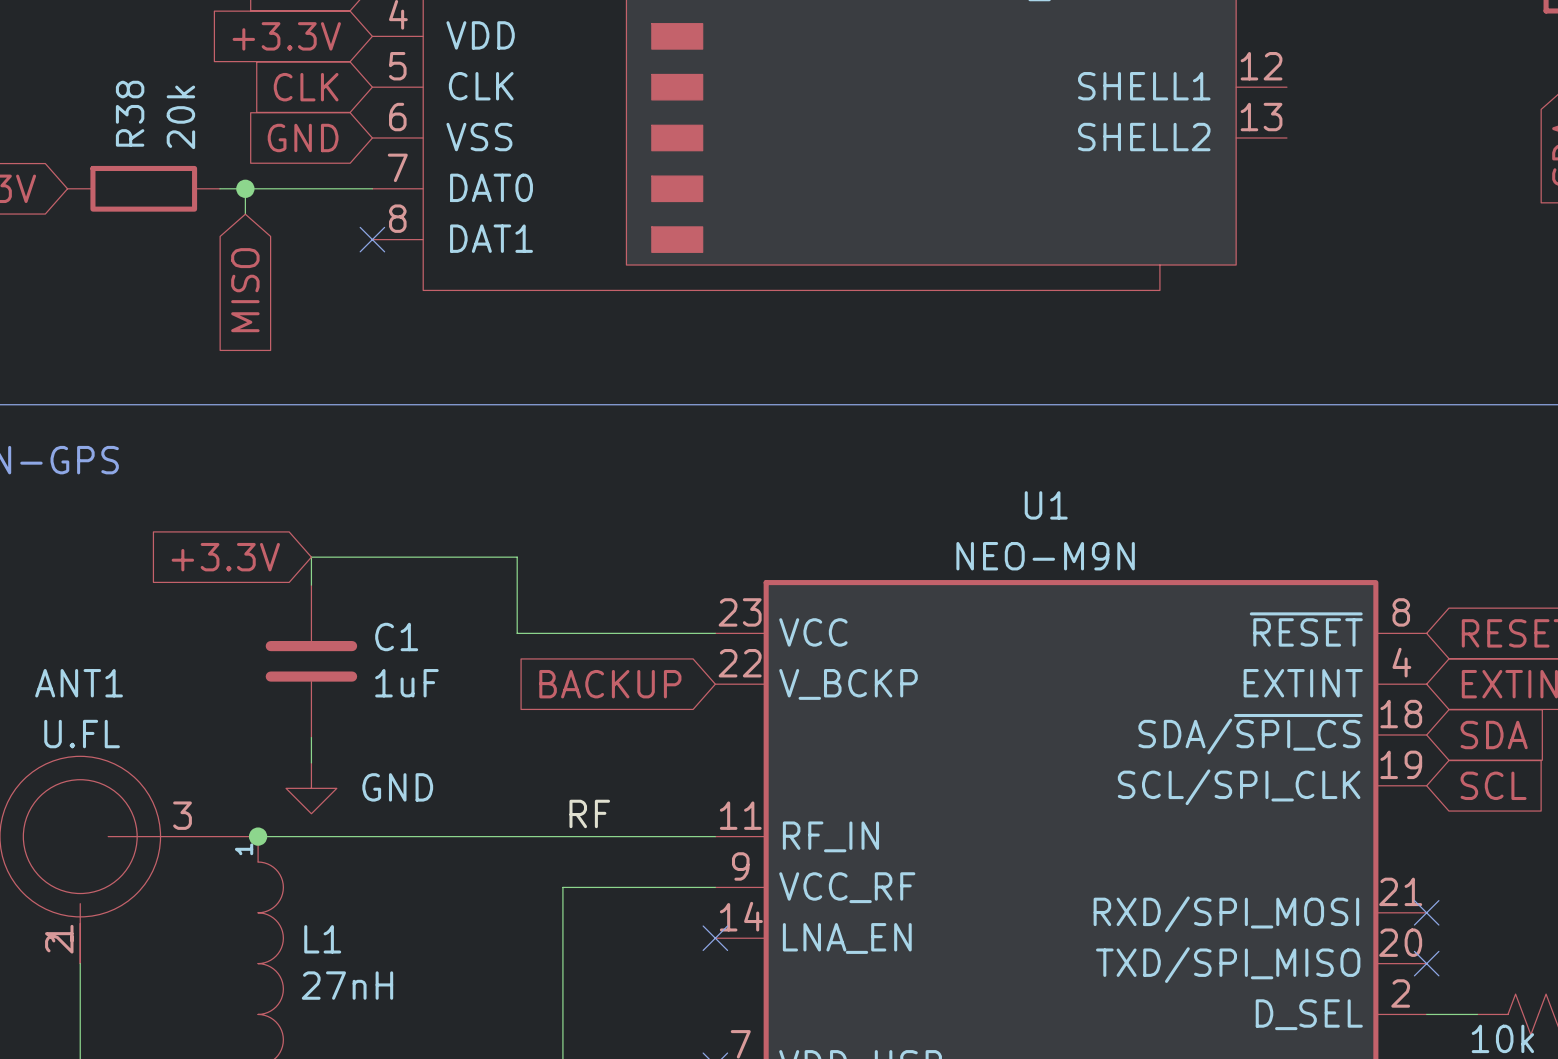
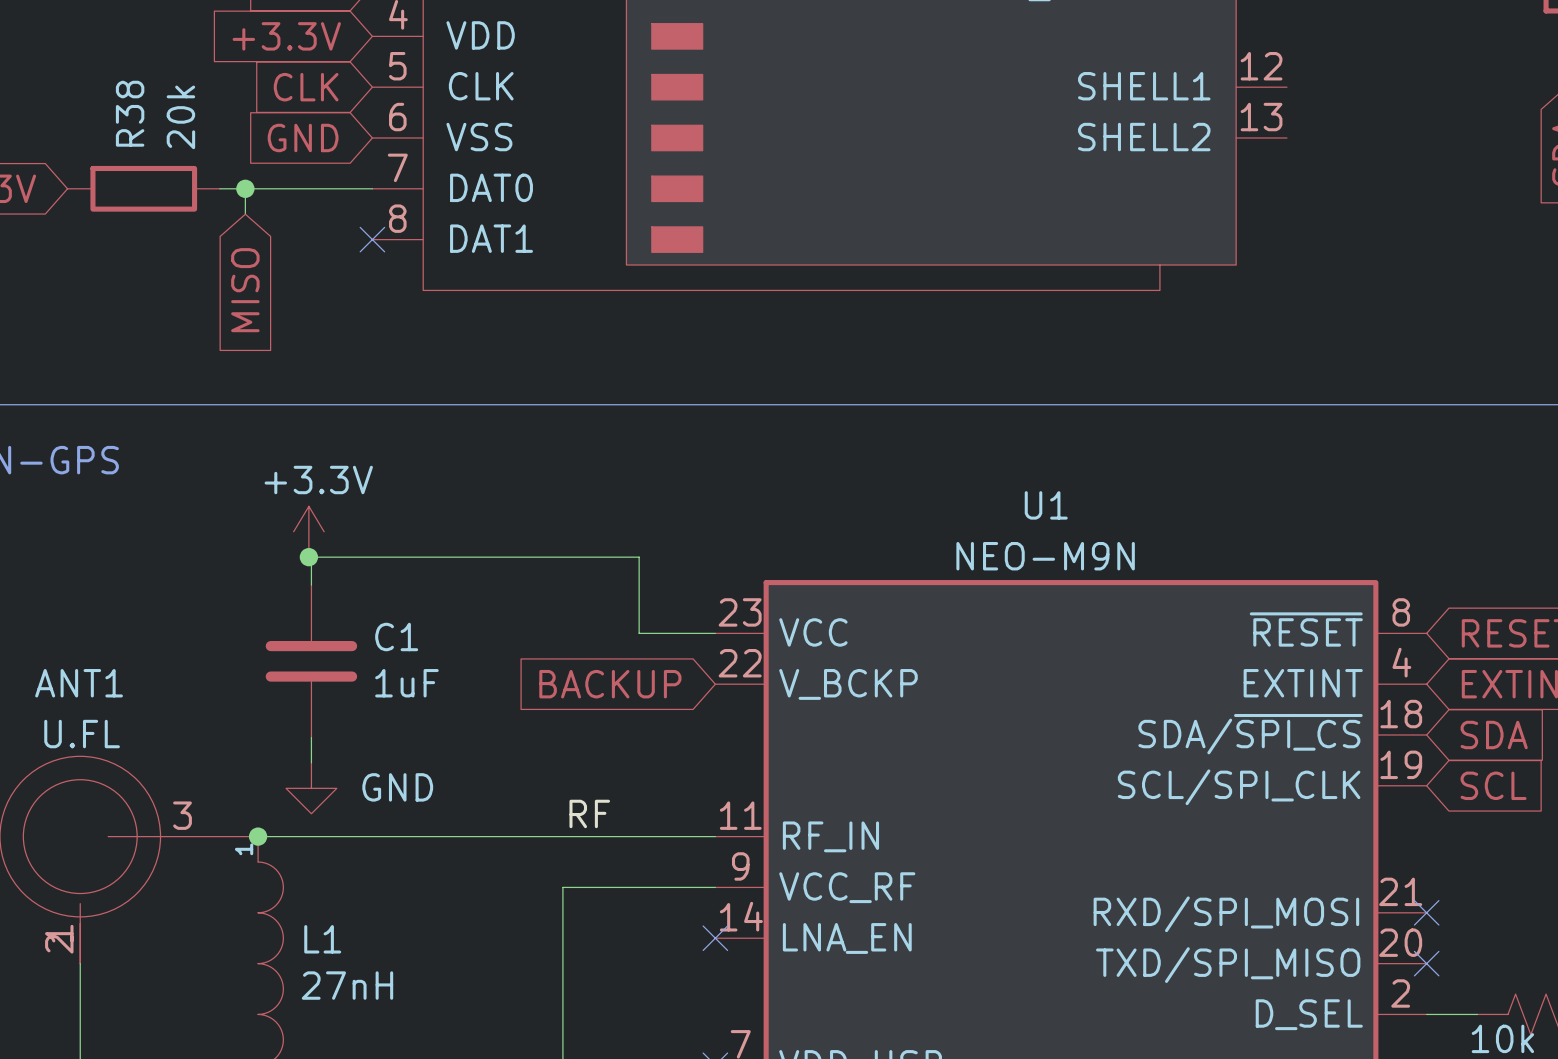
power symbol: none -> +3.3V (308, 531)
global label: +3.3V (225, 557) -> none
junction: none -> (308, 557)
wire: (517, 557) (517, 633) (639, 633) -> (517, 557) (639, 557) (639, 633)

